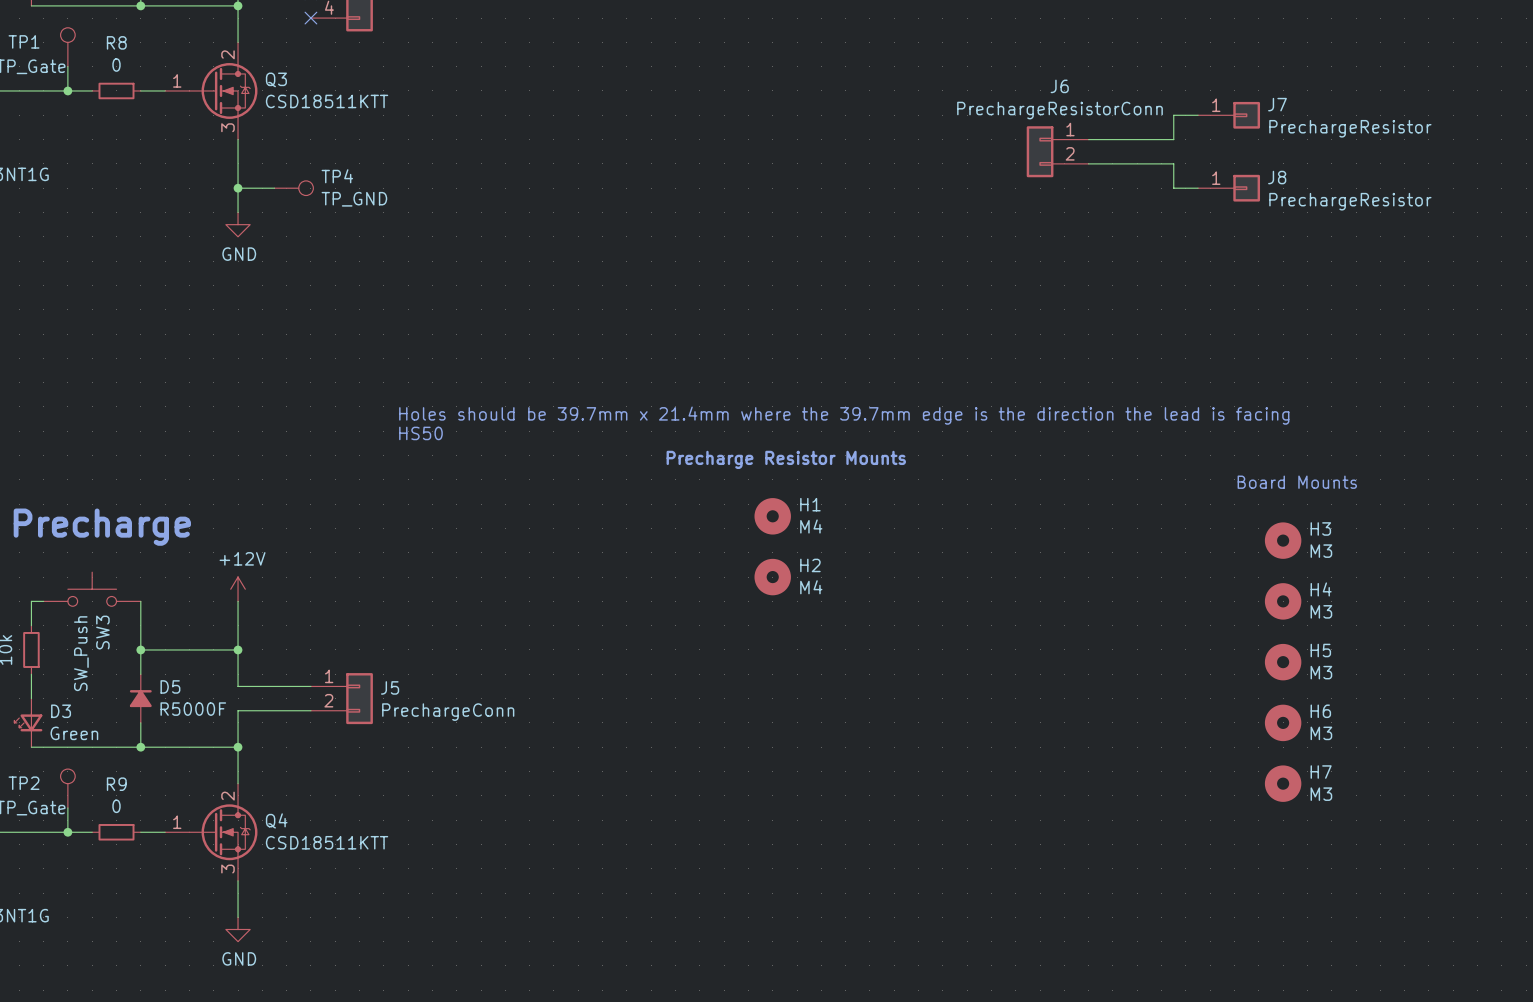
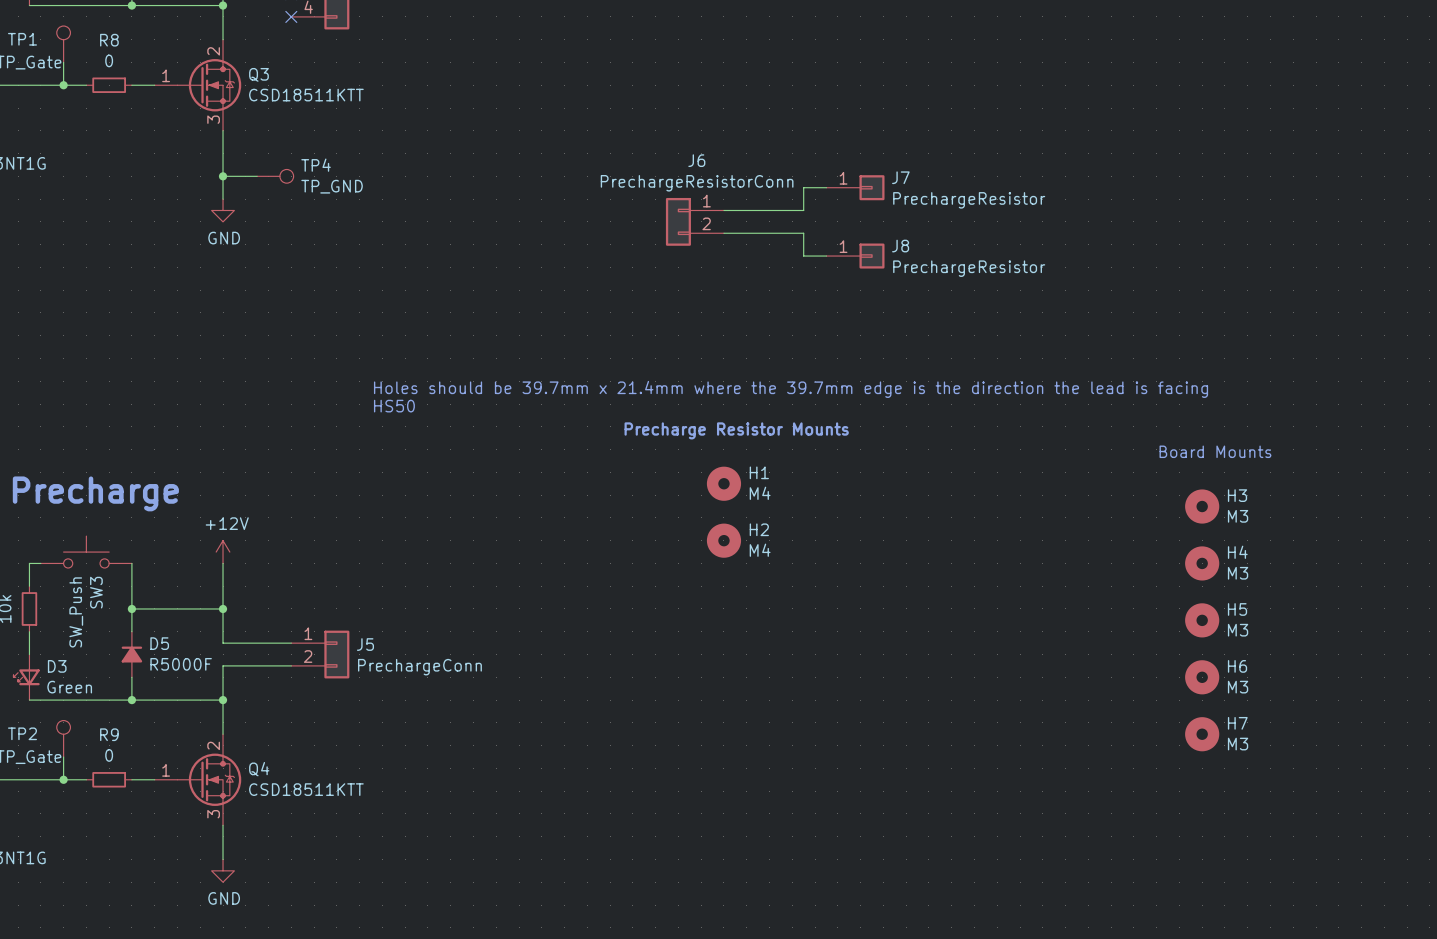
wire: (1198, 115) (1173, 115) (1173, 139) (1088, 139) -> none
J7 position: (1229, 115) -> (855, 187)
J6 position: (1057, 151) -> (694, 221)
wire: (1088, 163) (1173, 163) (1173, 188) (1198, 188) -> none
J8 position: (1229, 188) -> (855, 256)
wire: none -> (826, 187) (803, 187) (803, 210) (723, 210)
wire: none -> (723, 233) (803, 233) (803, 256) (826, 256)

